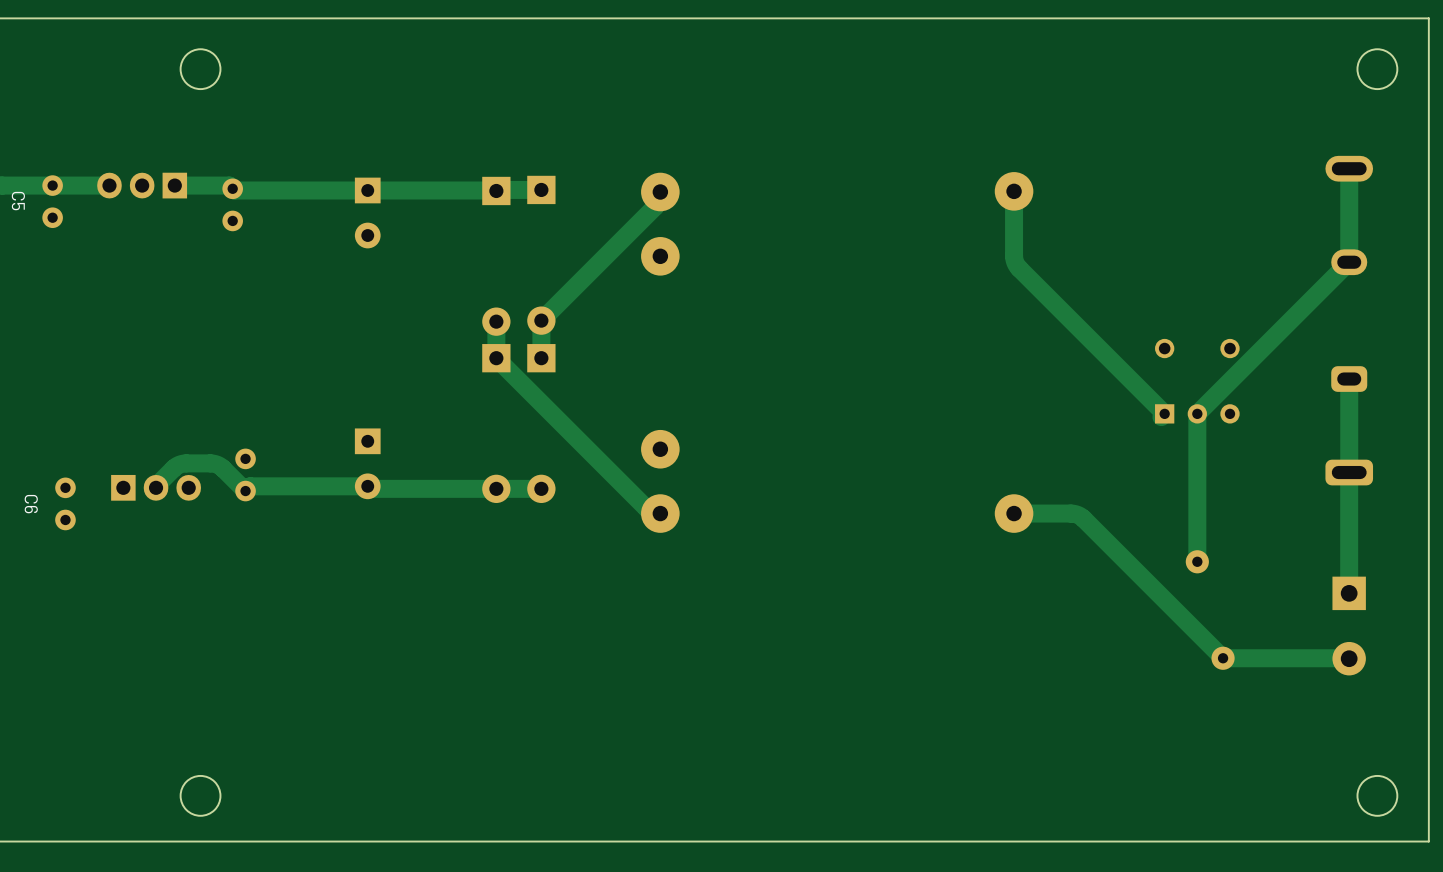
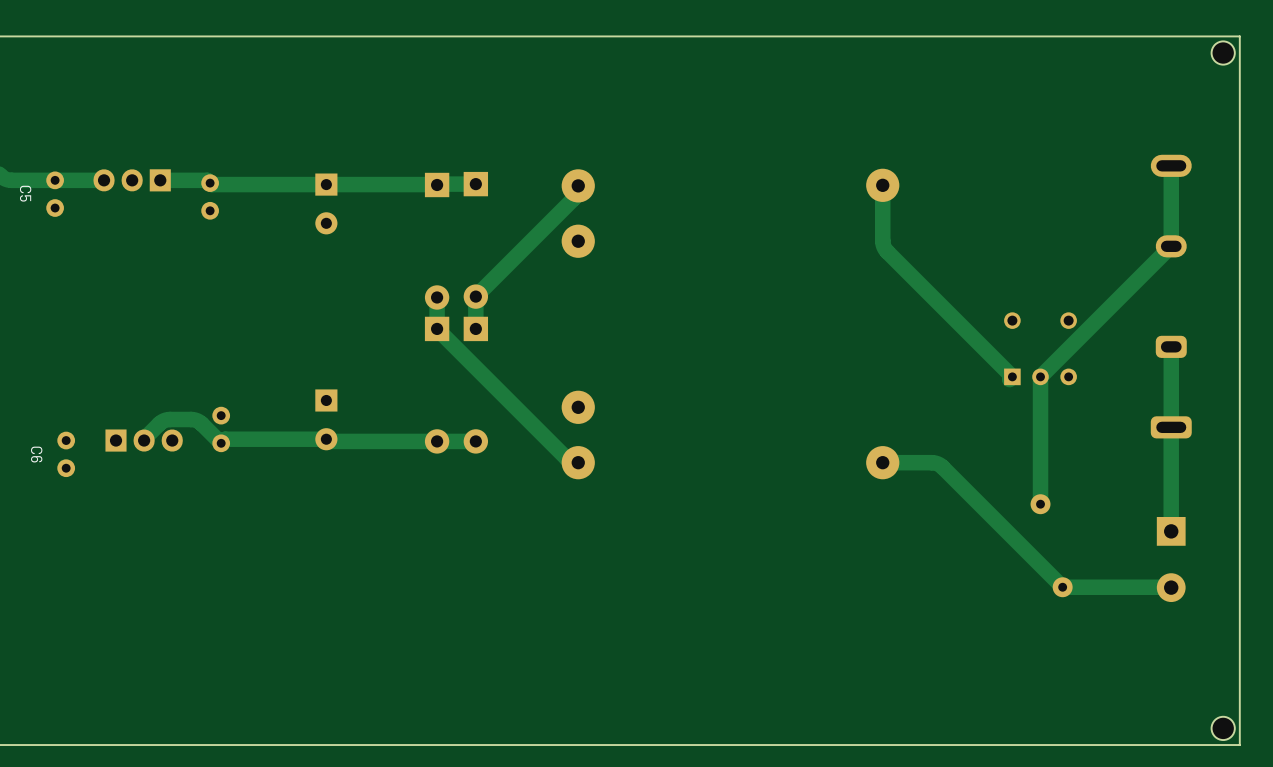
part: none -> (1223, 53)
round board edge: [180, 48, 221, 90] -> none
round board edge: [1357, 48, 1398, 90] -> none
round board edge: [180, 775, 221, 817] -> none
round board edge: [1357, 775, 1398, 817] -> none
part: none -> (1223, 728)

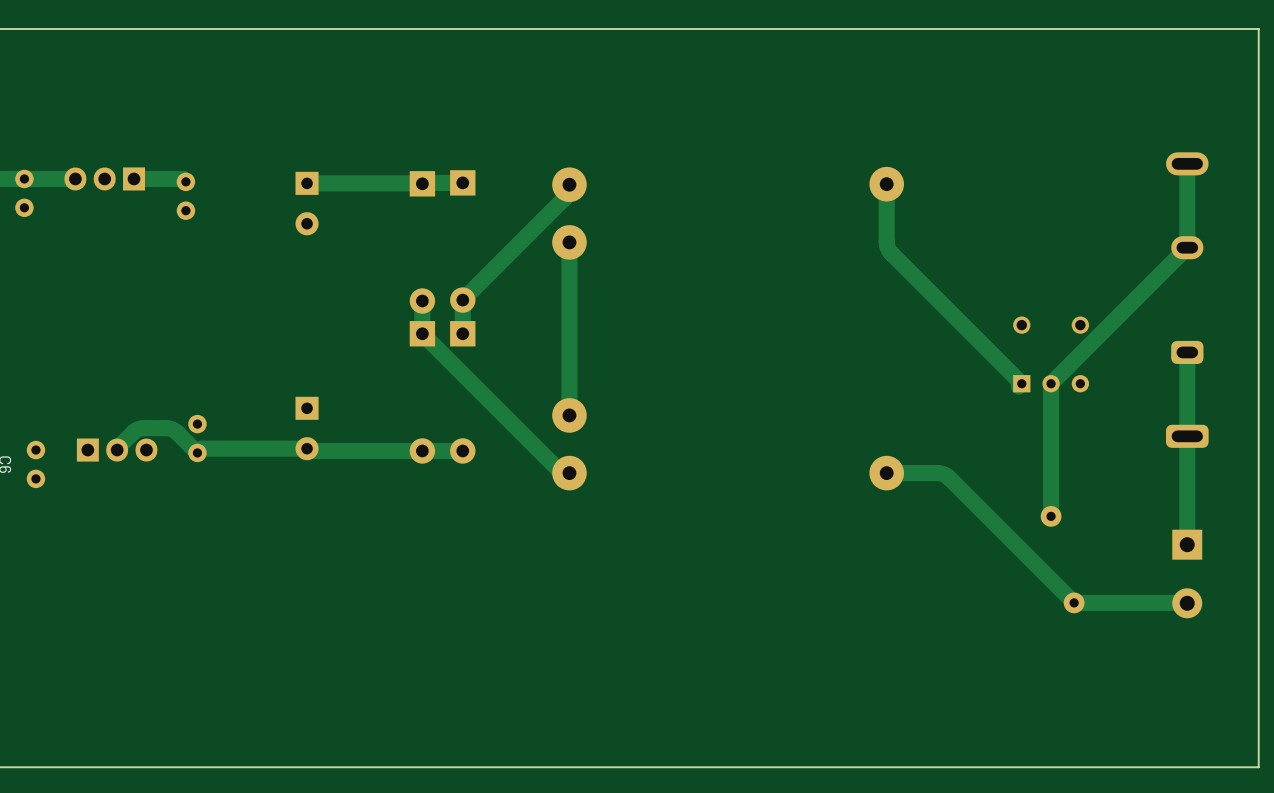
part: (1223, 53) -> none
track: (210, 183) (326, 184) -> none
track: none -> (569, 242) (569, 415)
part: (1223, 728) -> none

